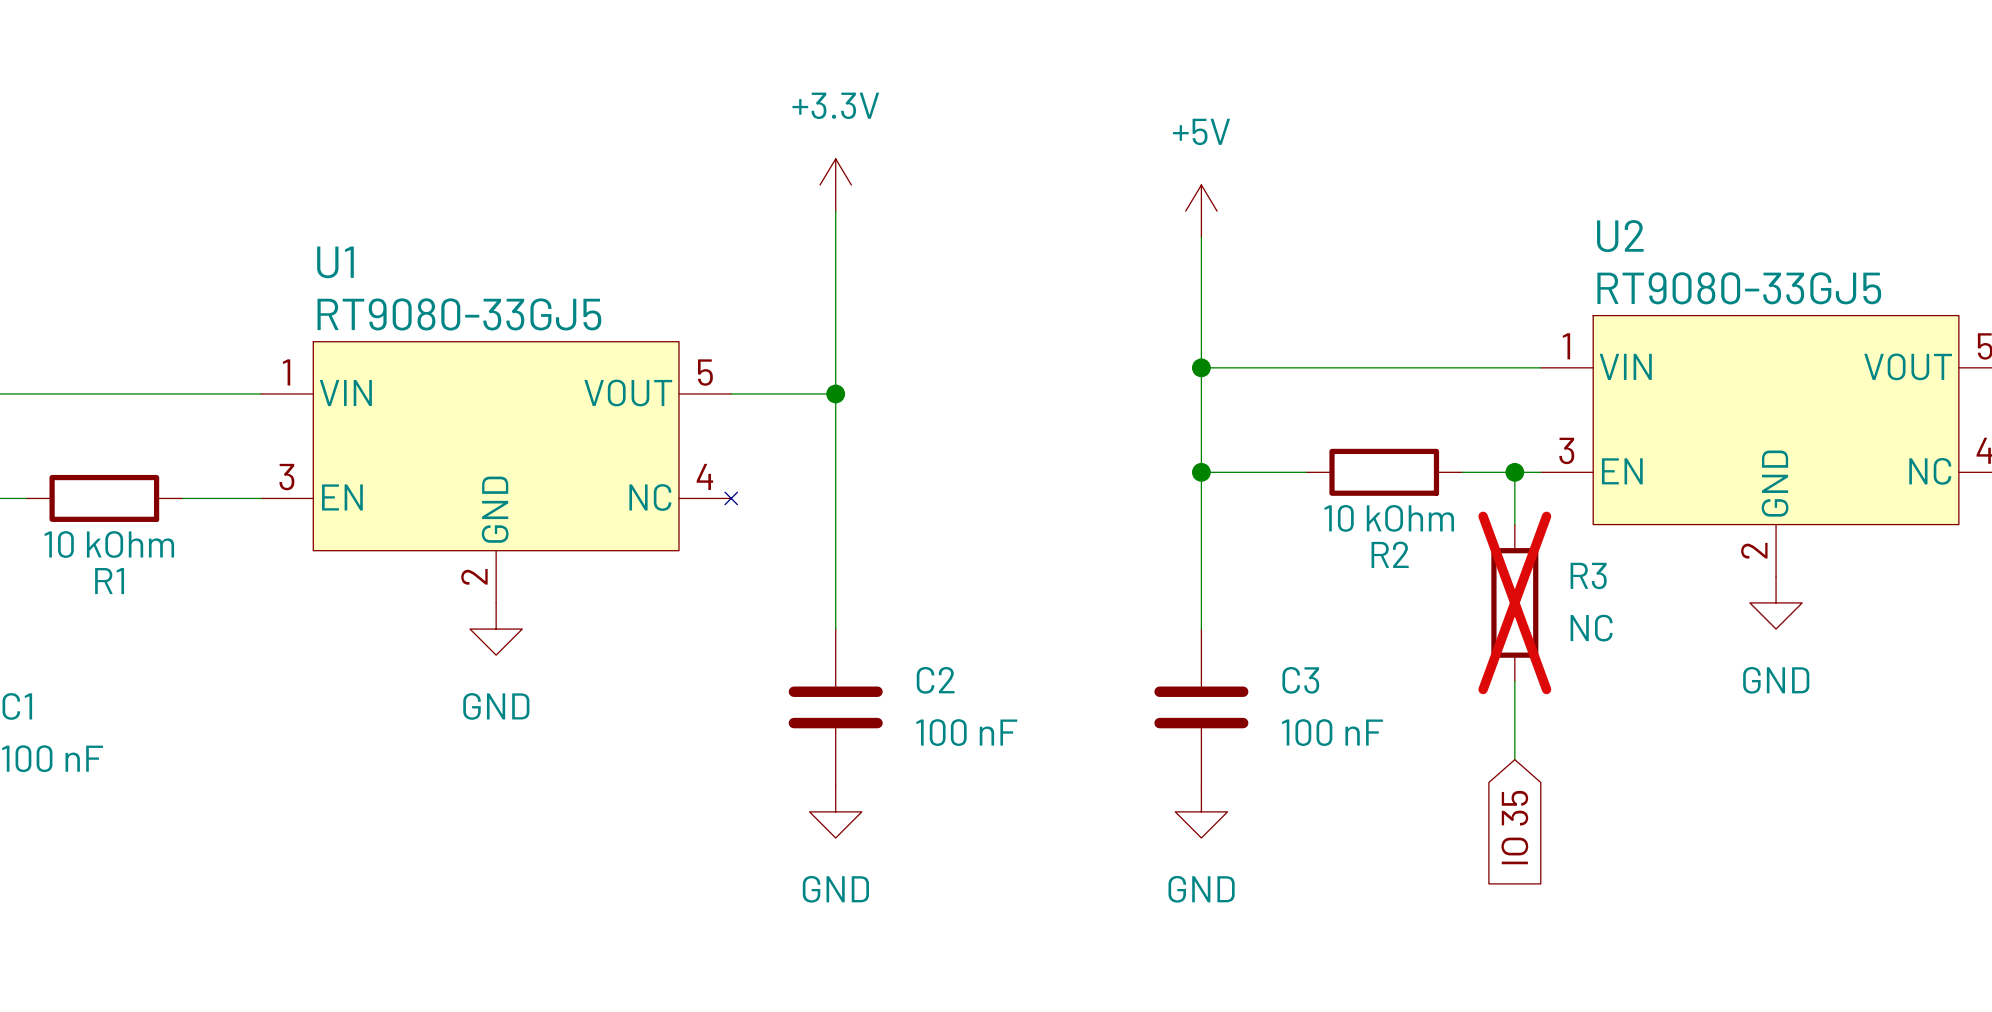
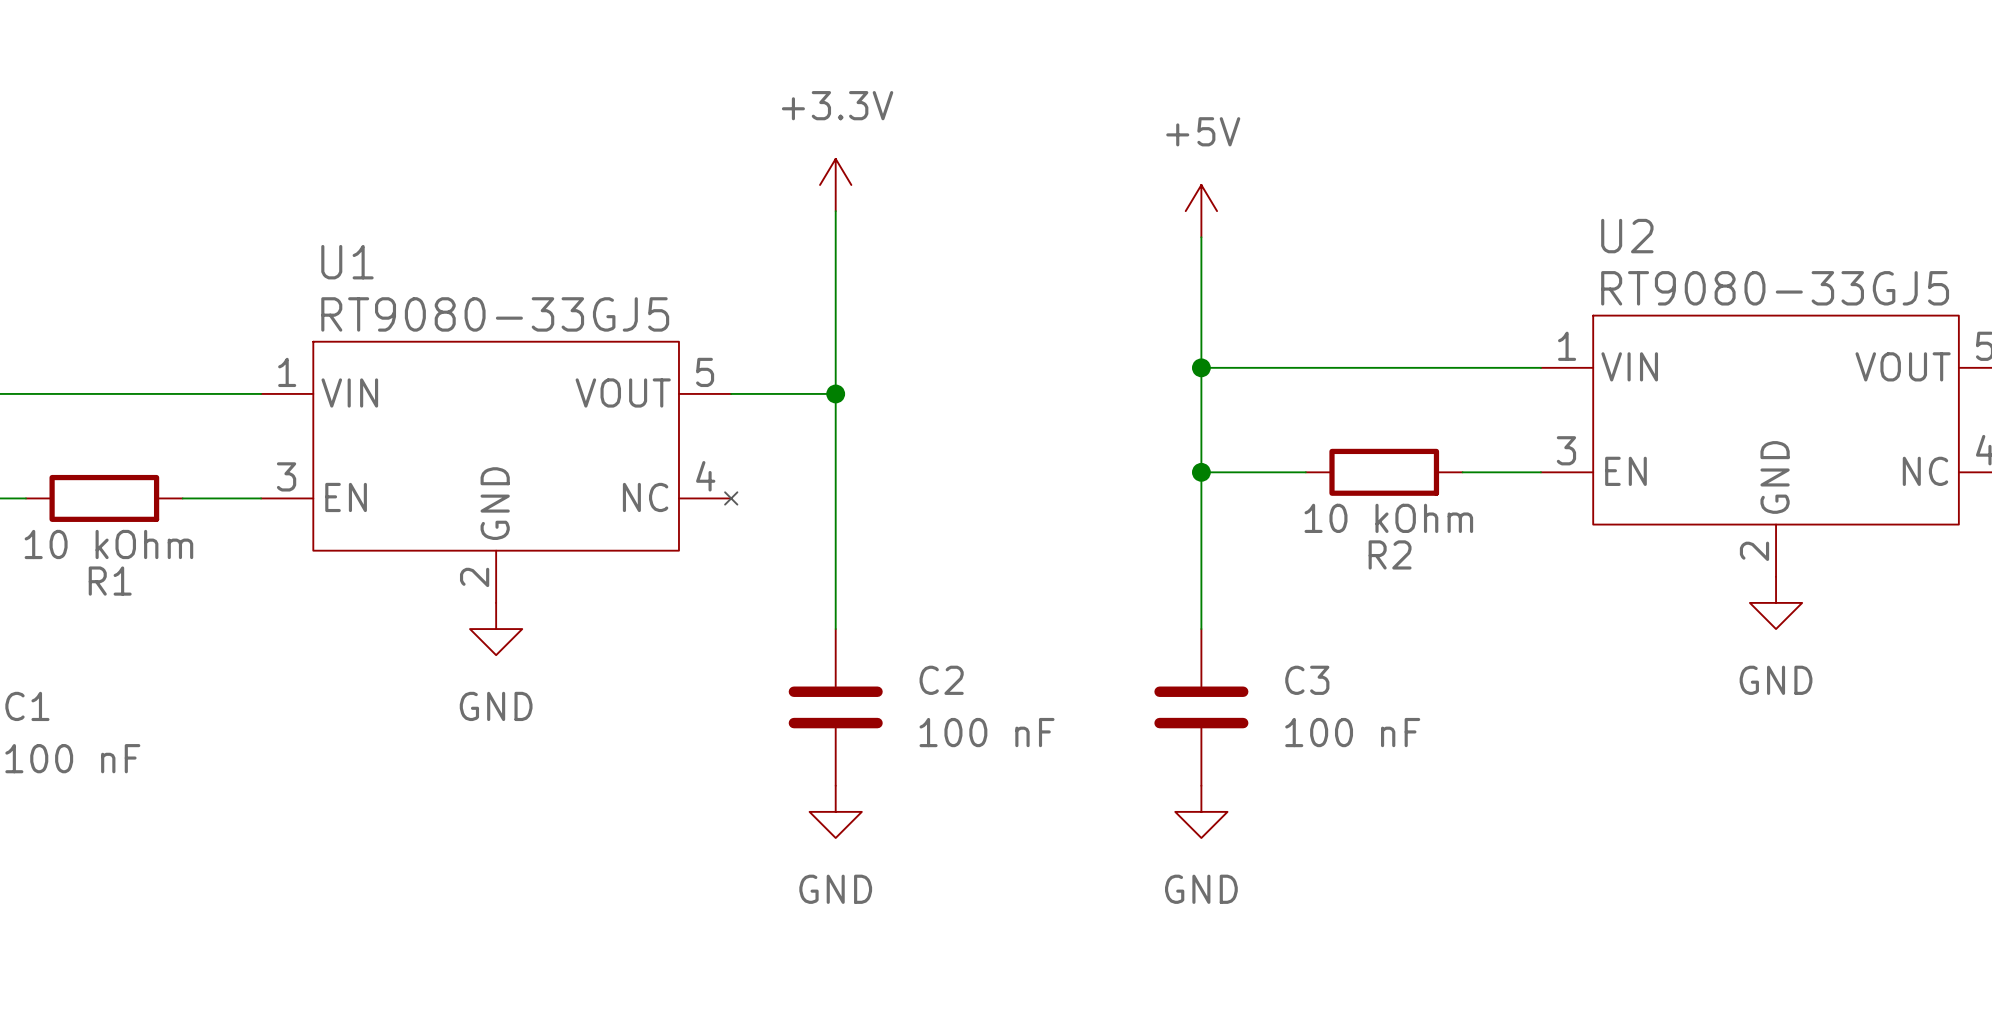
wire: (1514, 472) (1514, 524) -> none
junction: (1514, 472) -> none
R3: NC (1514, 602) -> none
wire: (1514, 681) (1514, 759) -> none
global label: IO 35 (1514, 827) -> none

